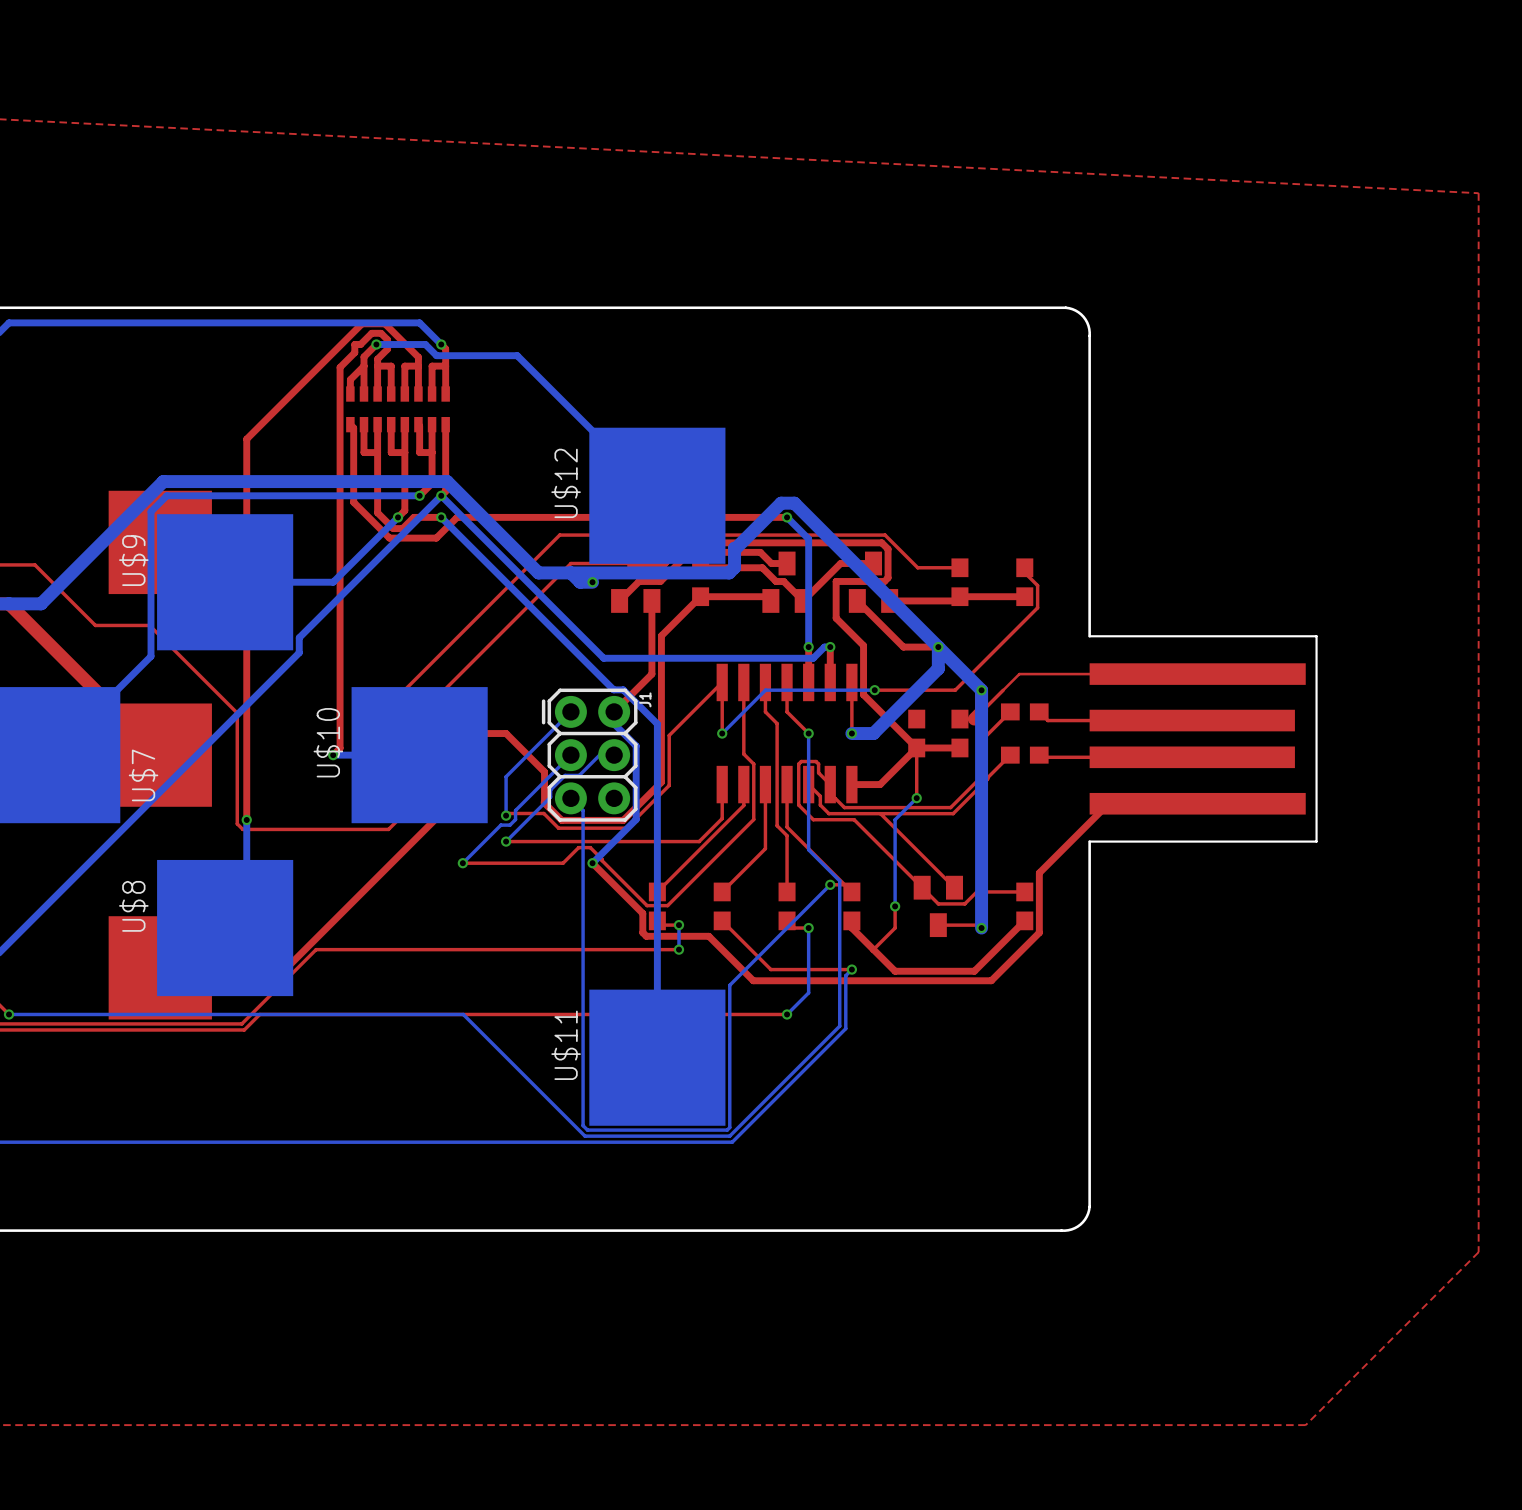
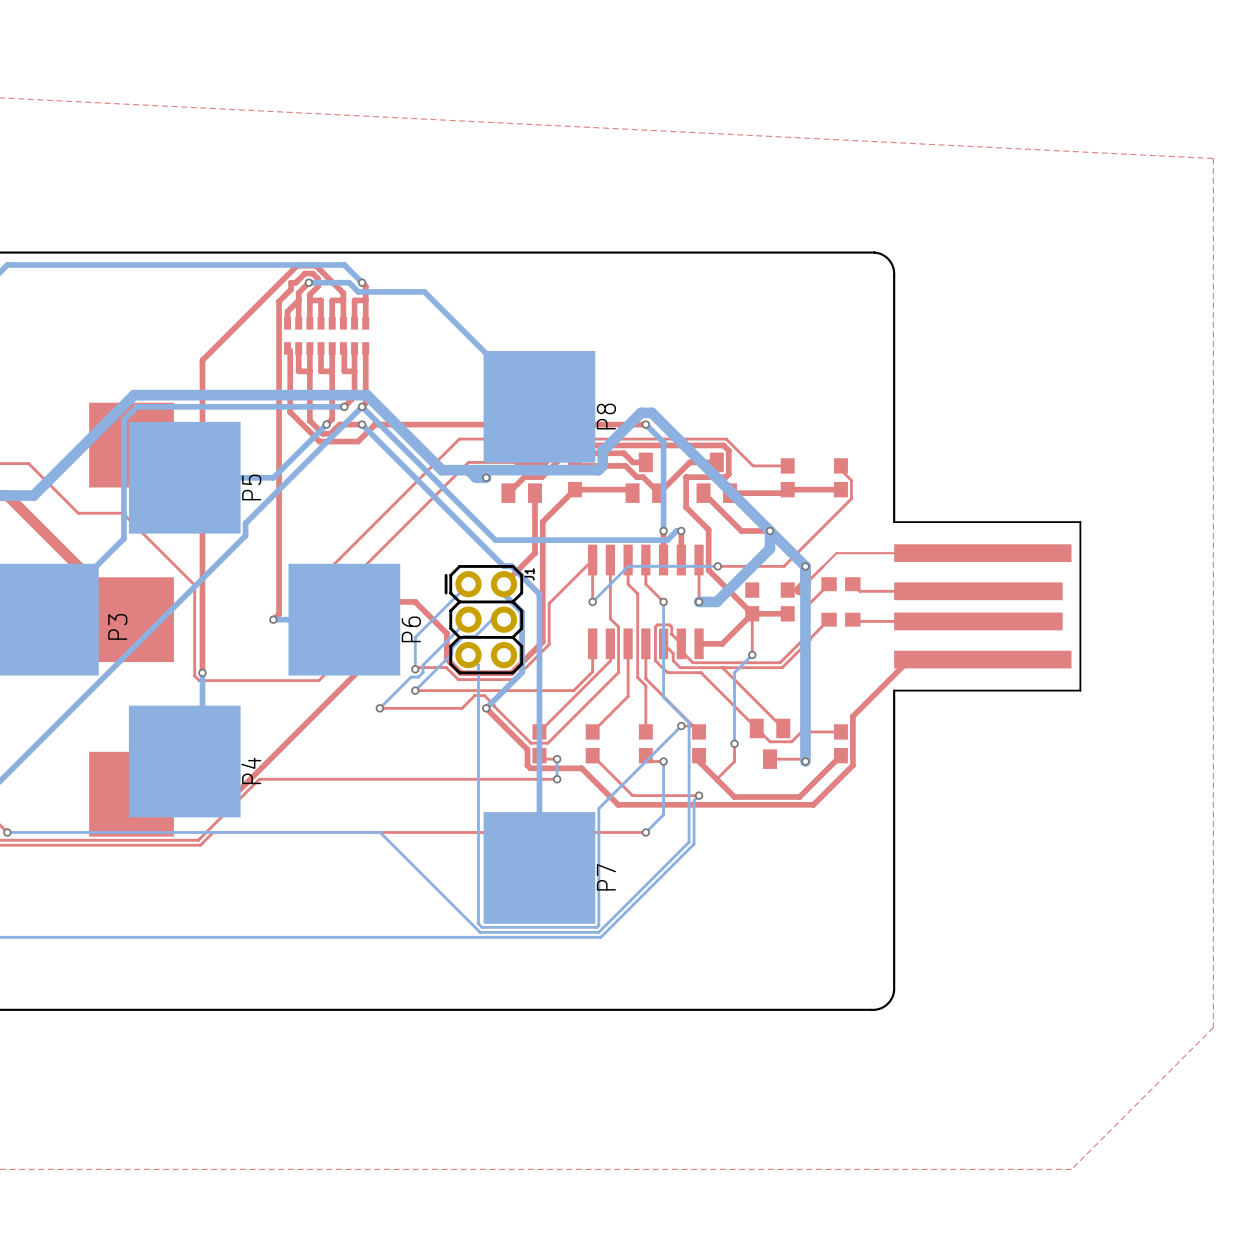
U$12 name: U$12 (566, 483) -> P8 (606, 416)
U$9 name: U$9 (133, 560) -> P5 (251, 487)
U$10 name: U$10 (328, 742) -> P6 (411, 629)
U$7 name: U$7 (143, 775) -> P3 (117, 626)
U$8 name: U$8 (133, 906) -> P4 (251, 770)
U$11 name: U$11 (566, 1045) -> P7 (606, 877)

